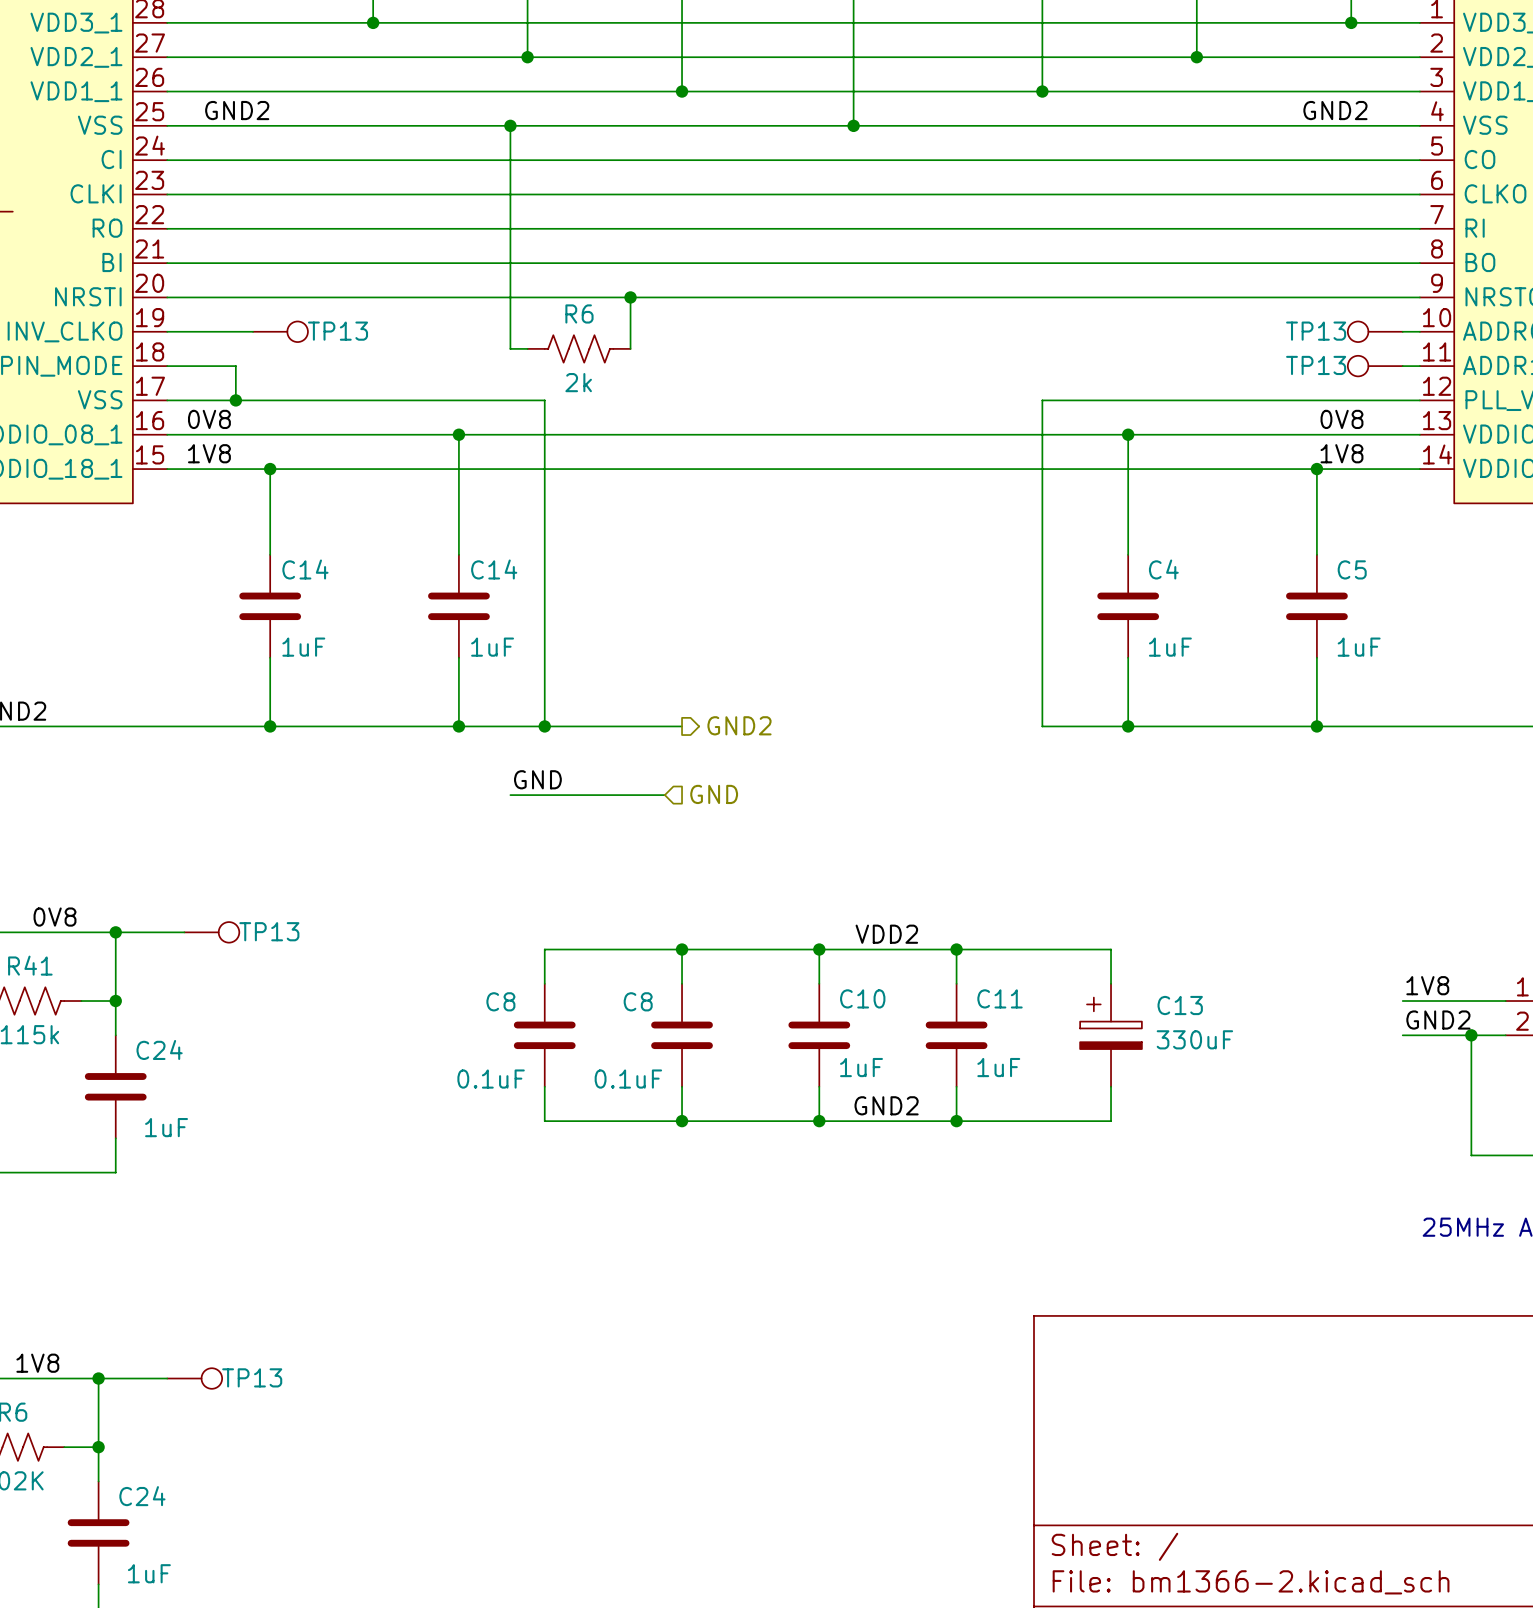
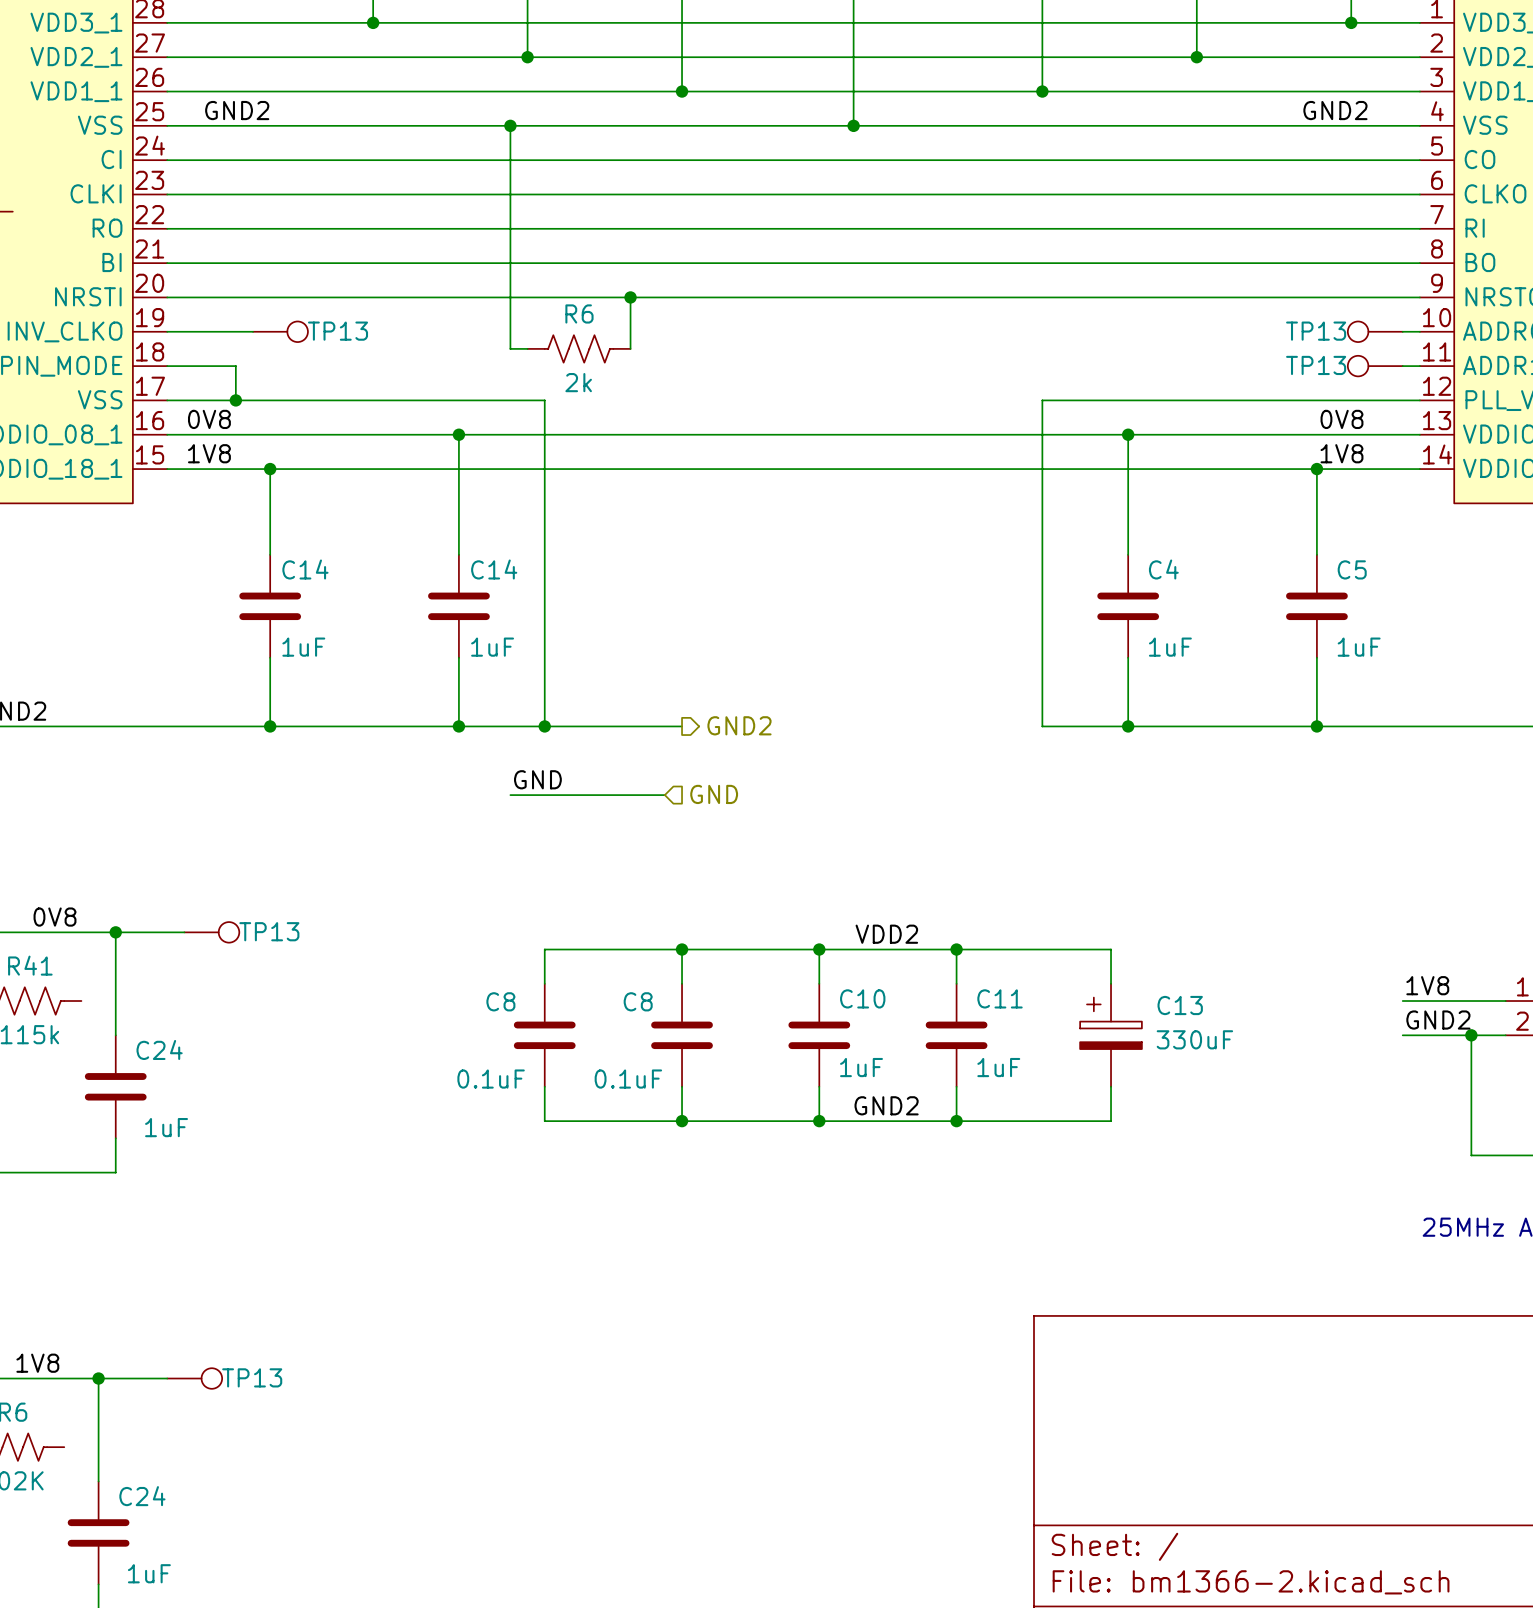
wire: (81, 1001) (115, 1001) -> none
junction: (115, 1001) -> none
wire: (64, 1447) (98, 1447) -> none
junction: (98, 1447) -> none

